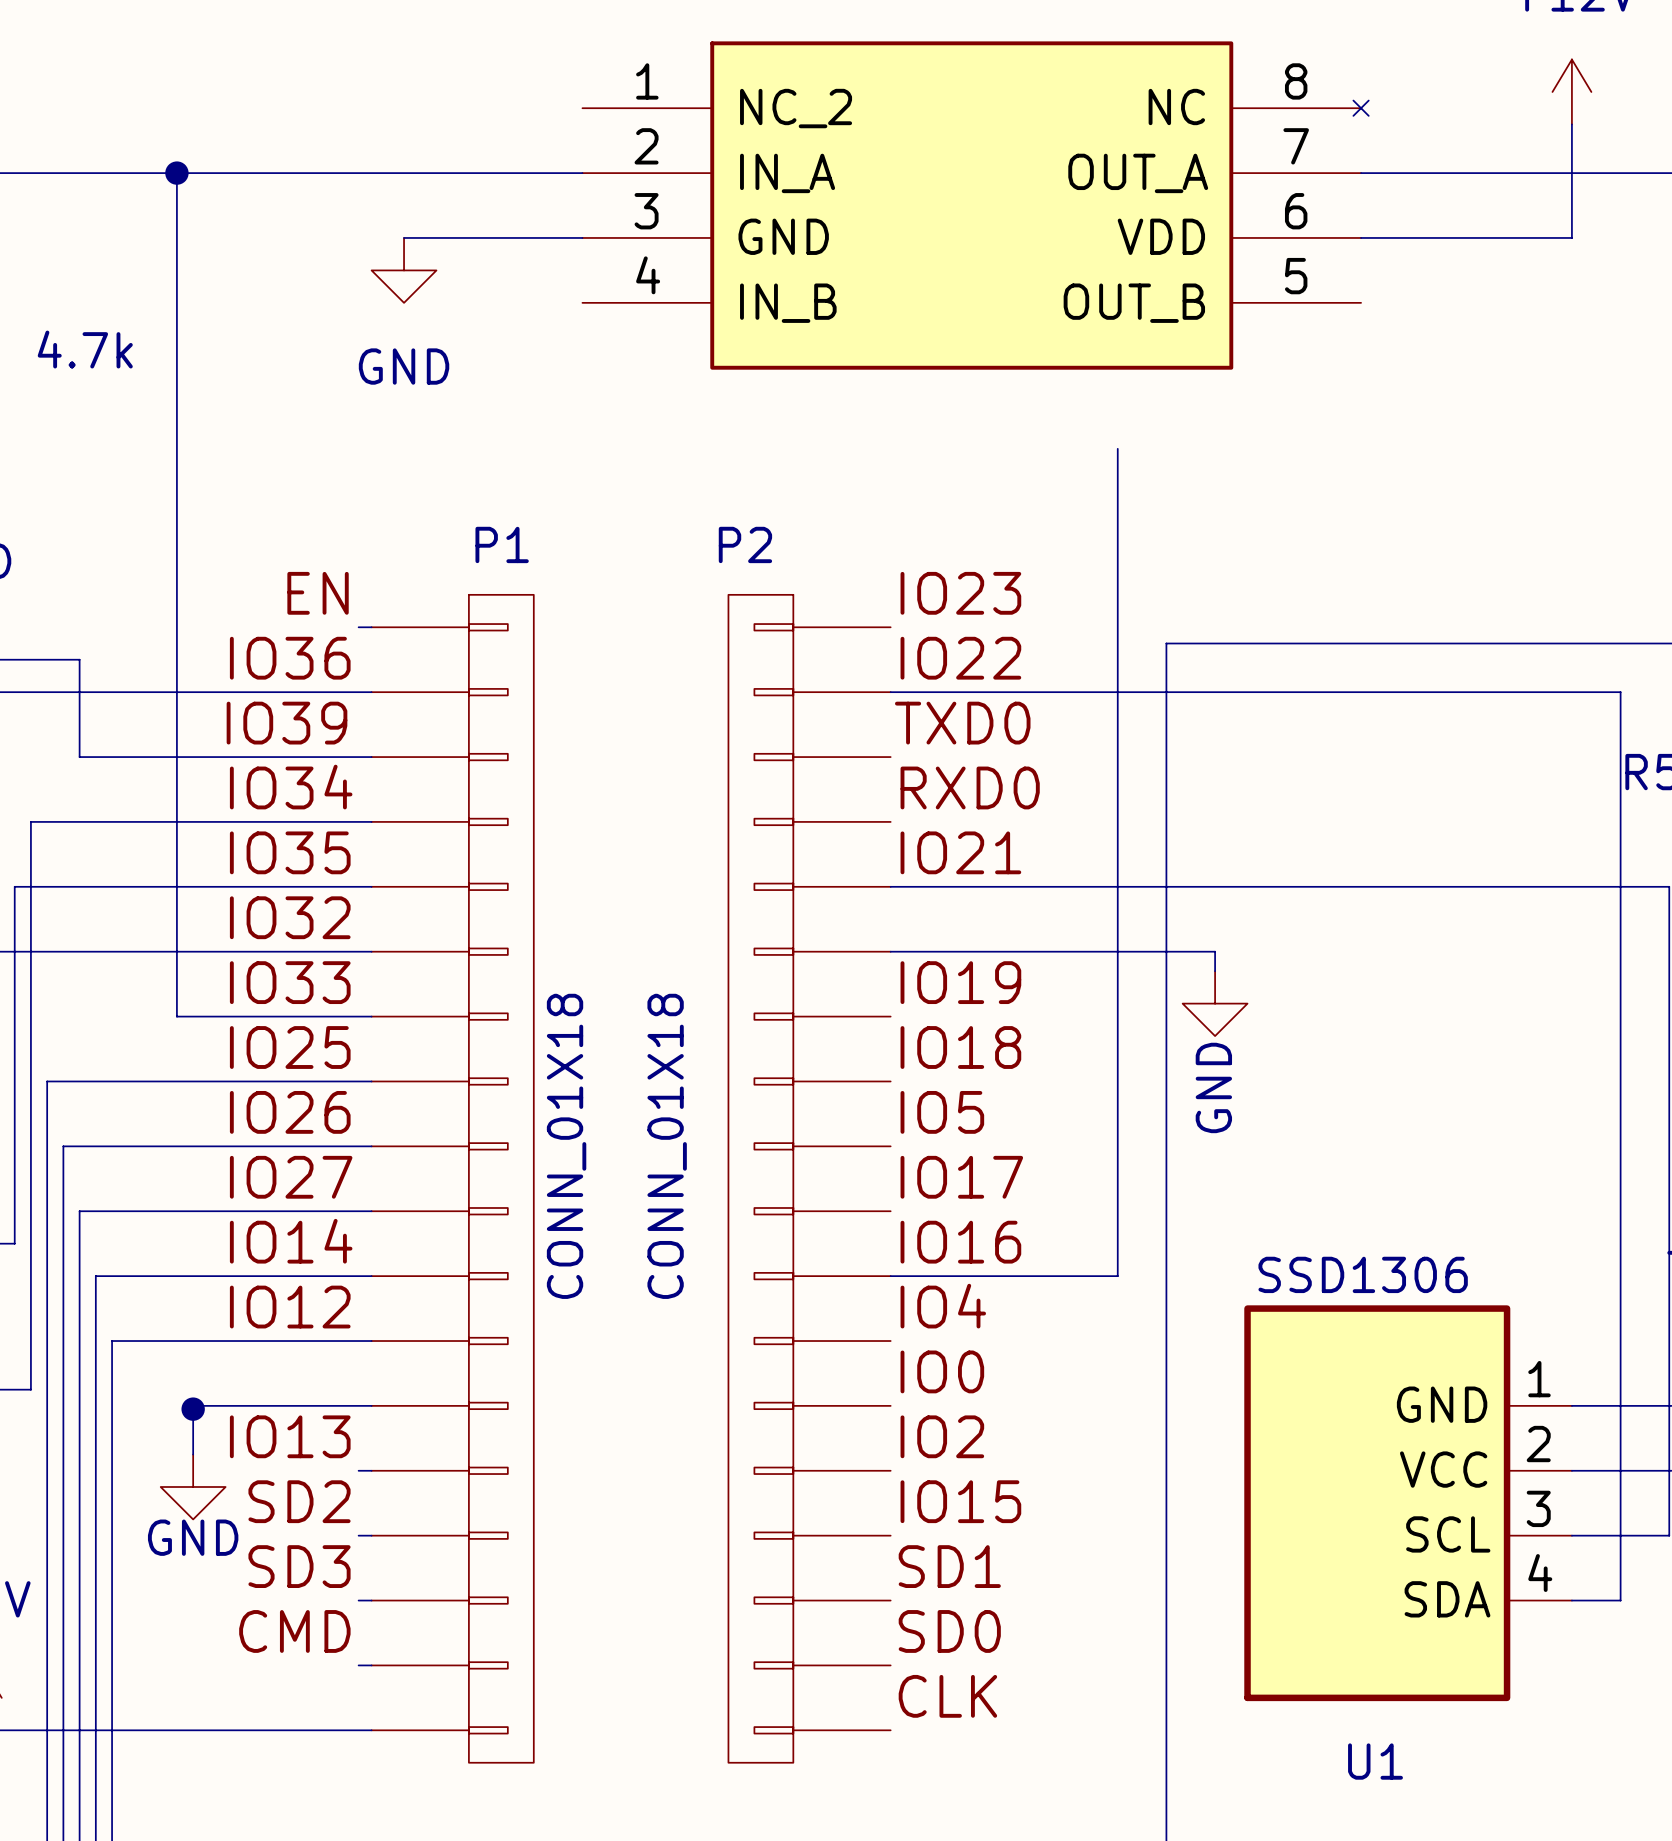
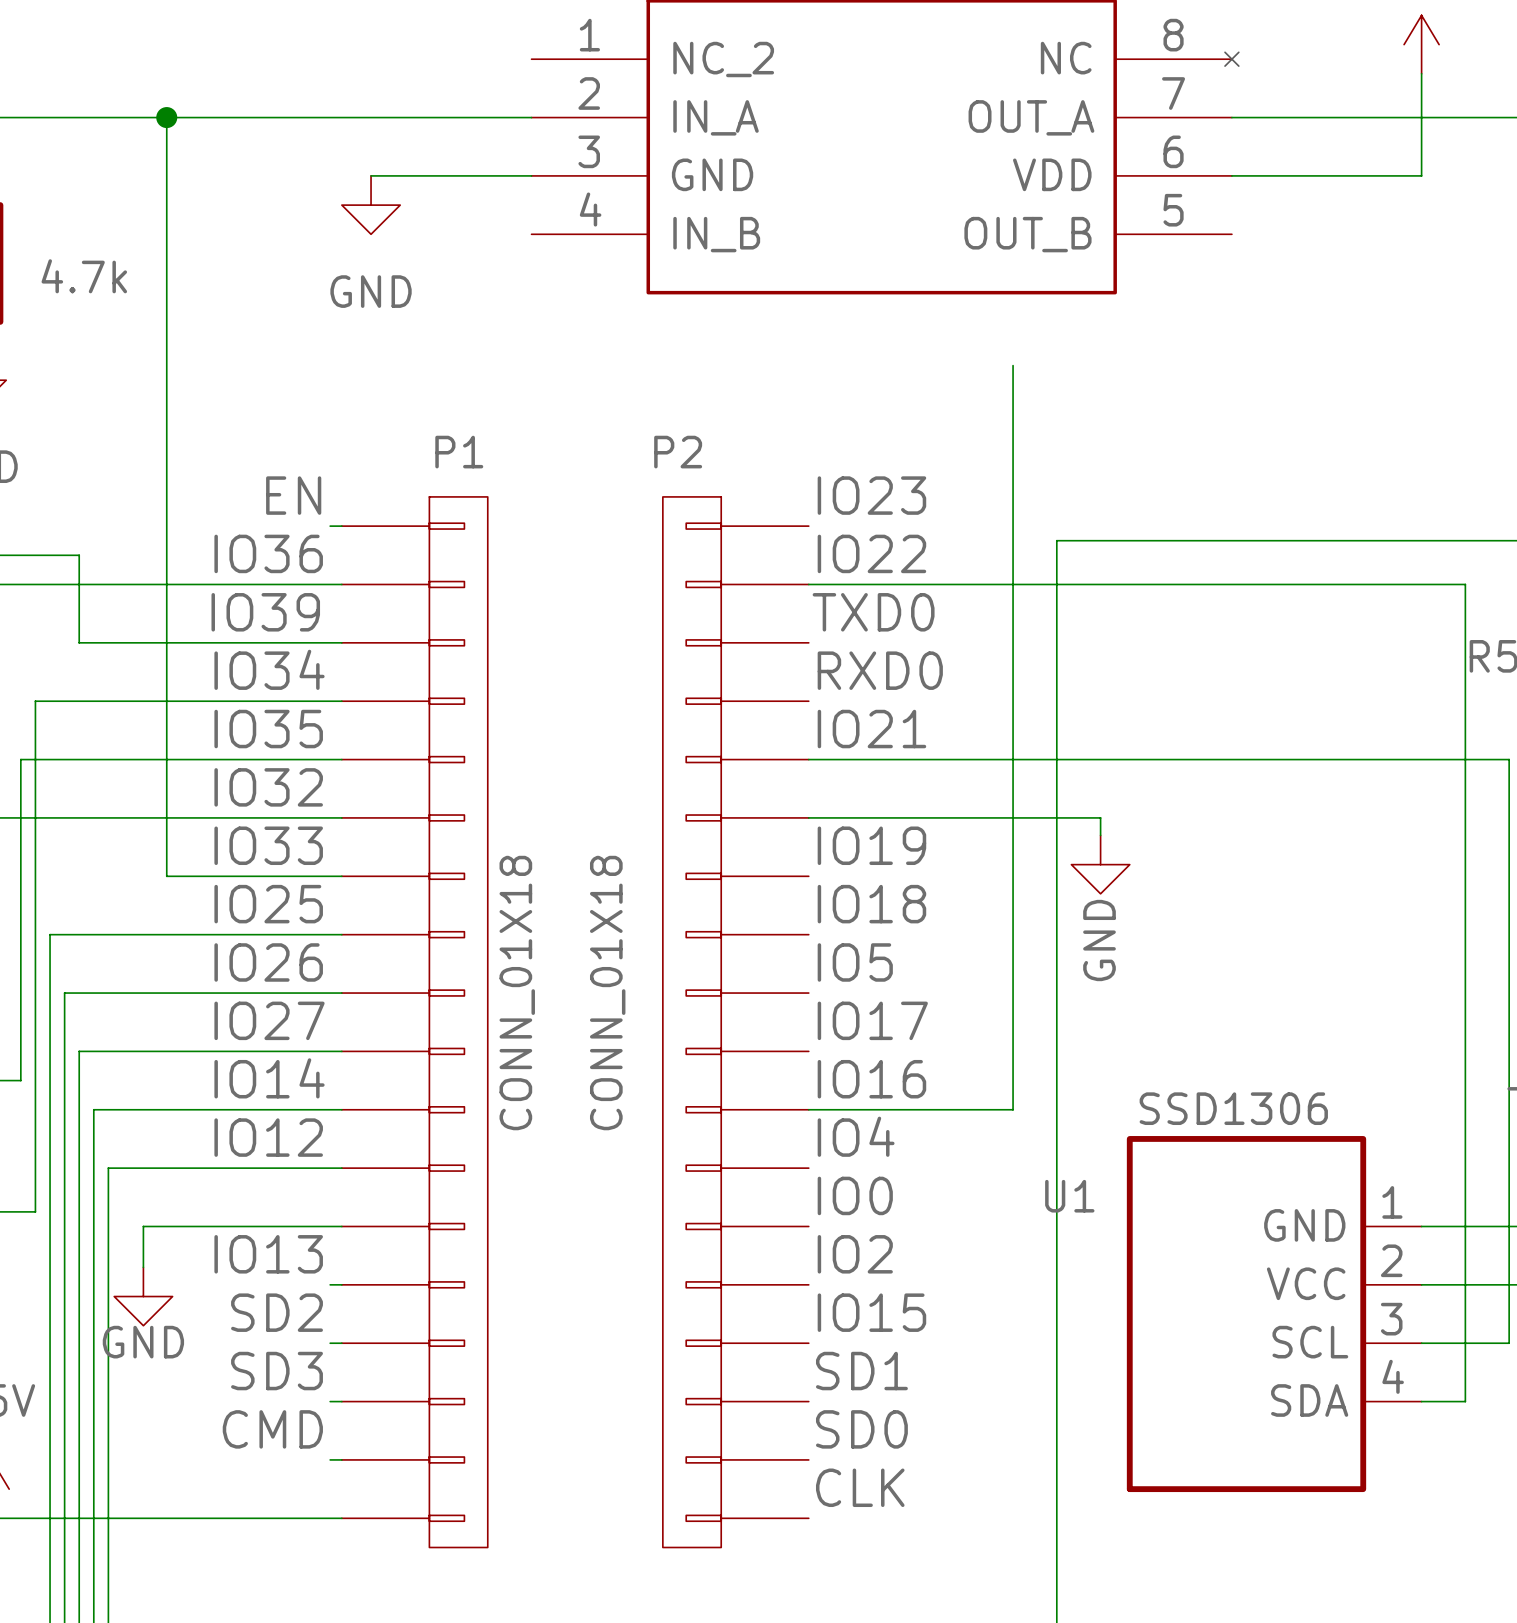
wire: (193, 1405) (193, 1454) -> (181, 1226) (143, 1226) (143, 1267)
junction: (193, 1409) -> none
power symbol position: GND (193, 1486) -> GND (143, 1296)
U1 name position: U1 (1375, 1761) -> U1 (1069, 1196)

